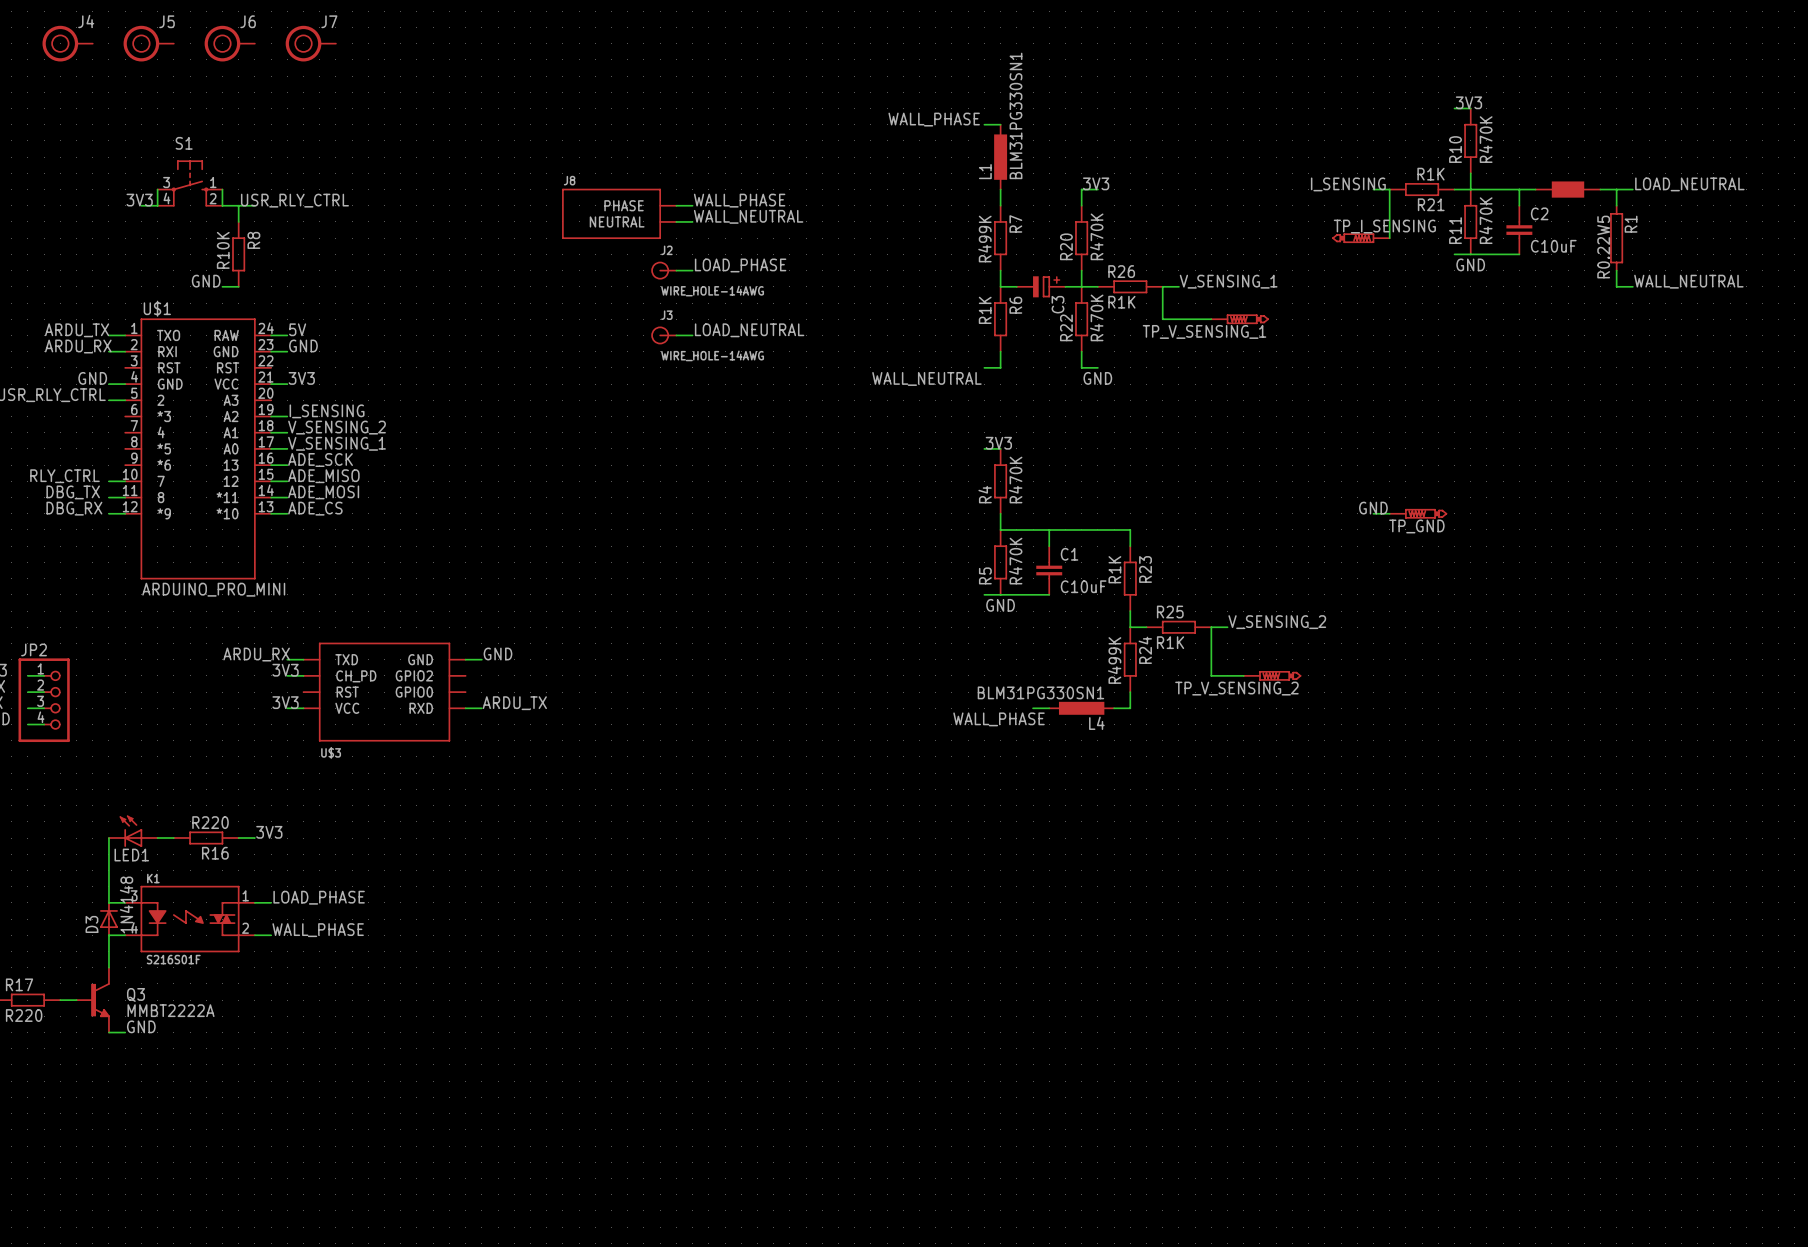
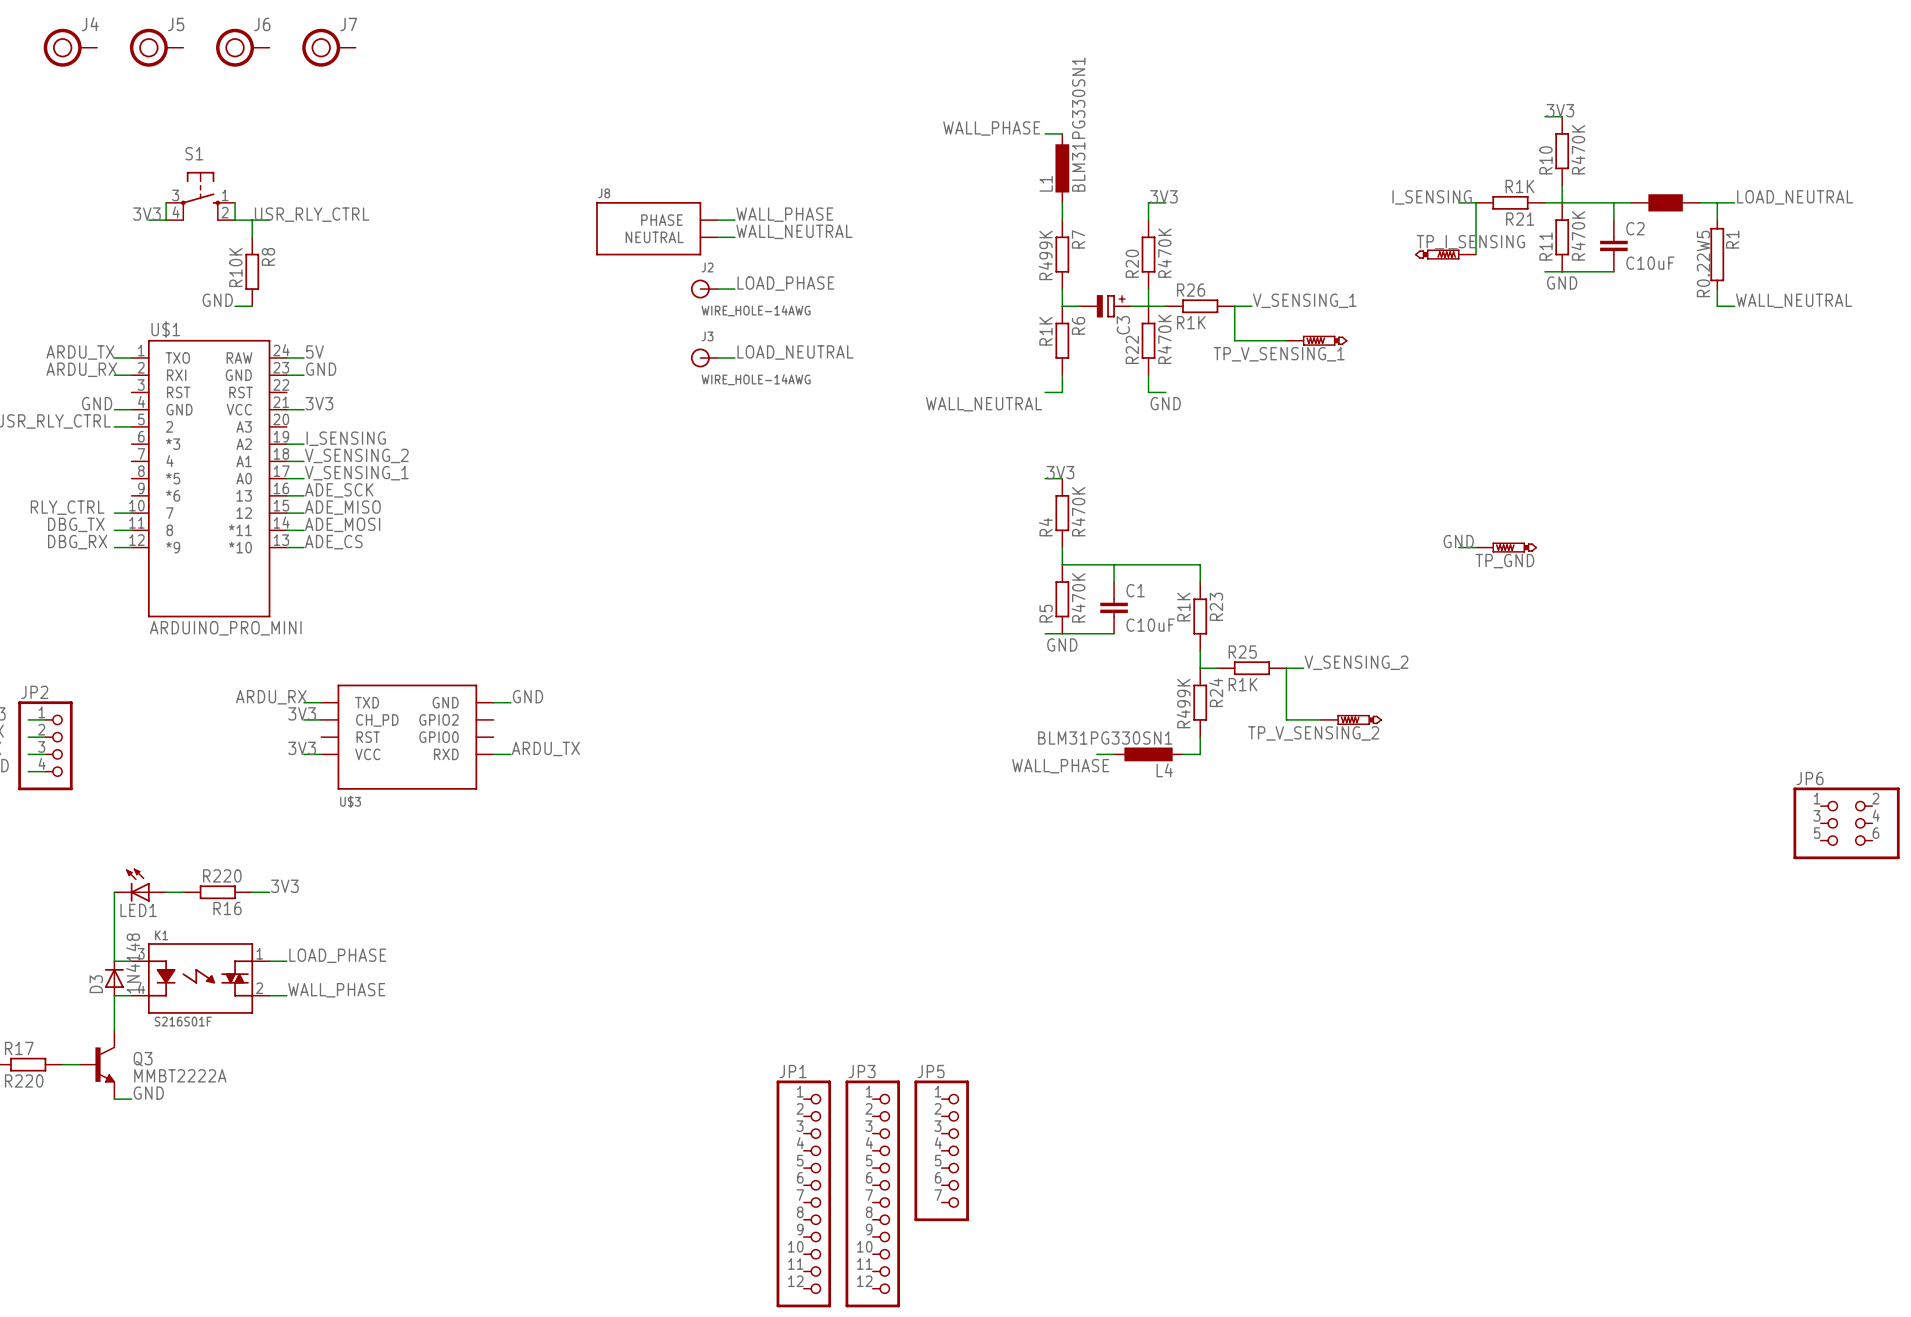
JP6: none -> (1846, 823)
JP5: none -> (941, 1150)
JP1: none -> (803, 1193)
JP3: none -> (872, 1193)

